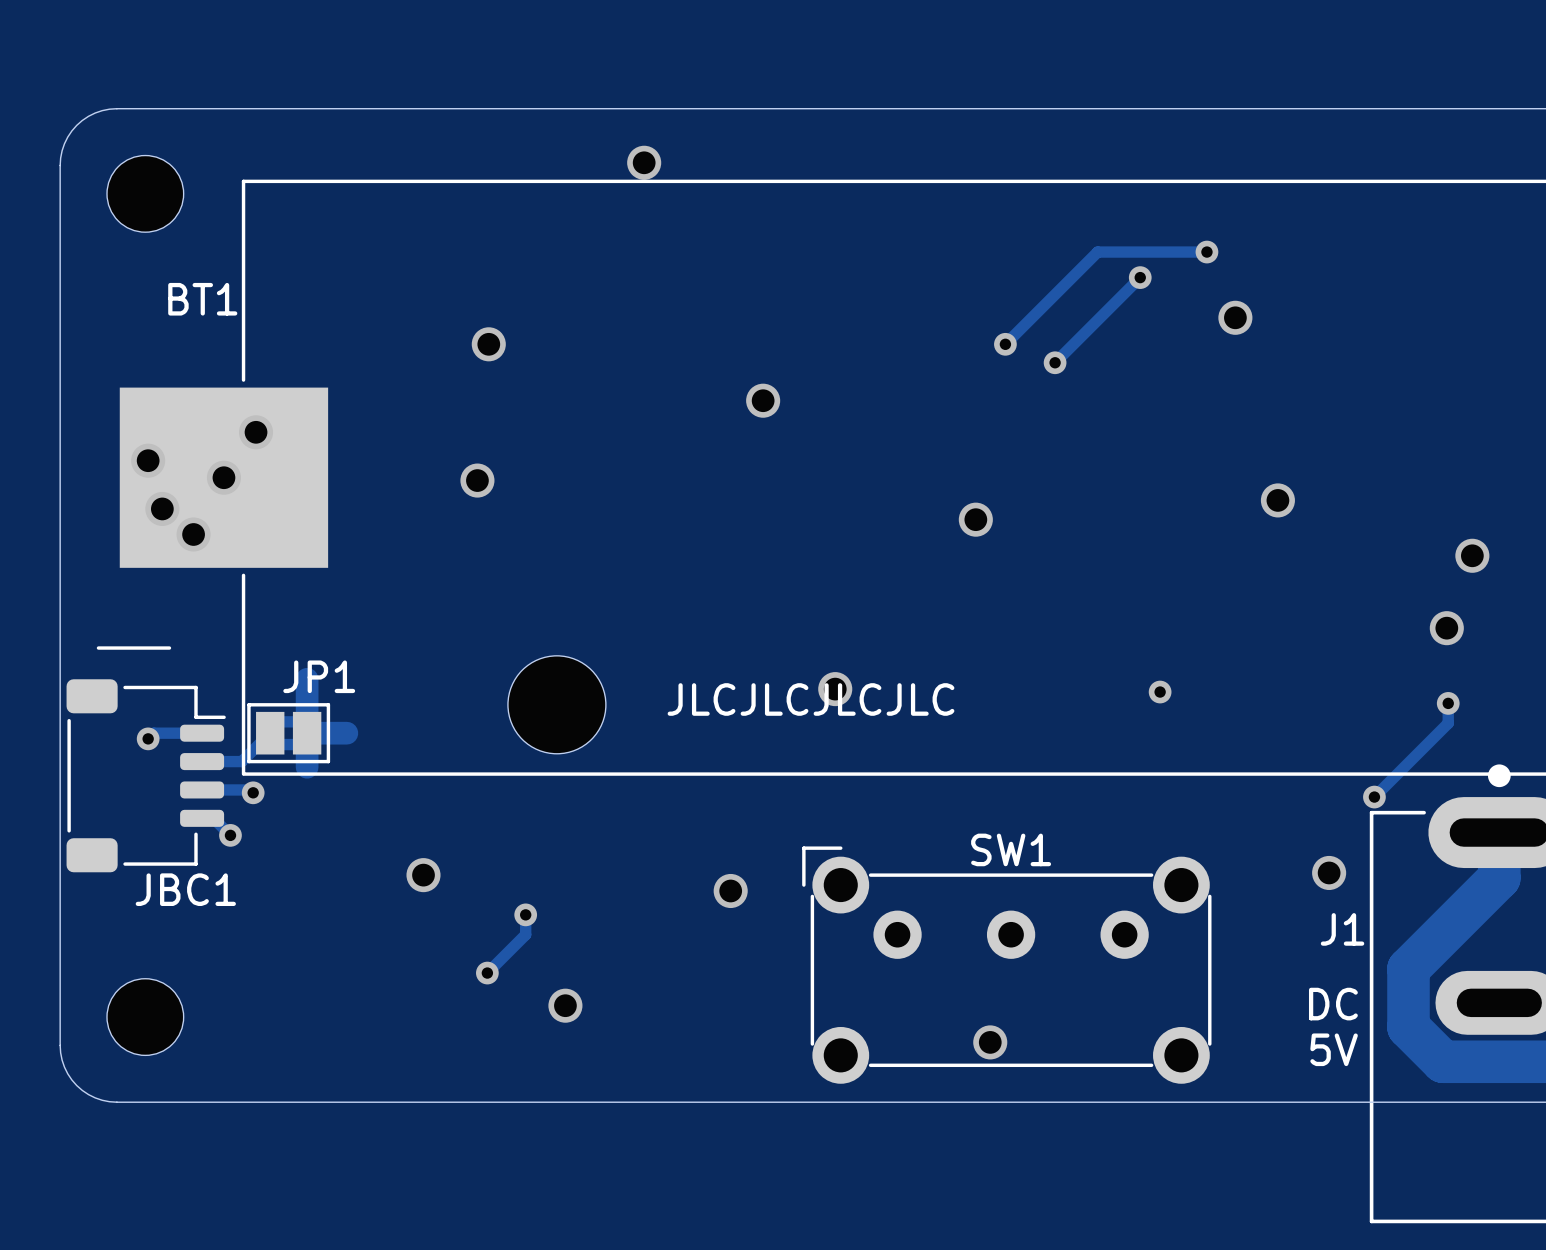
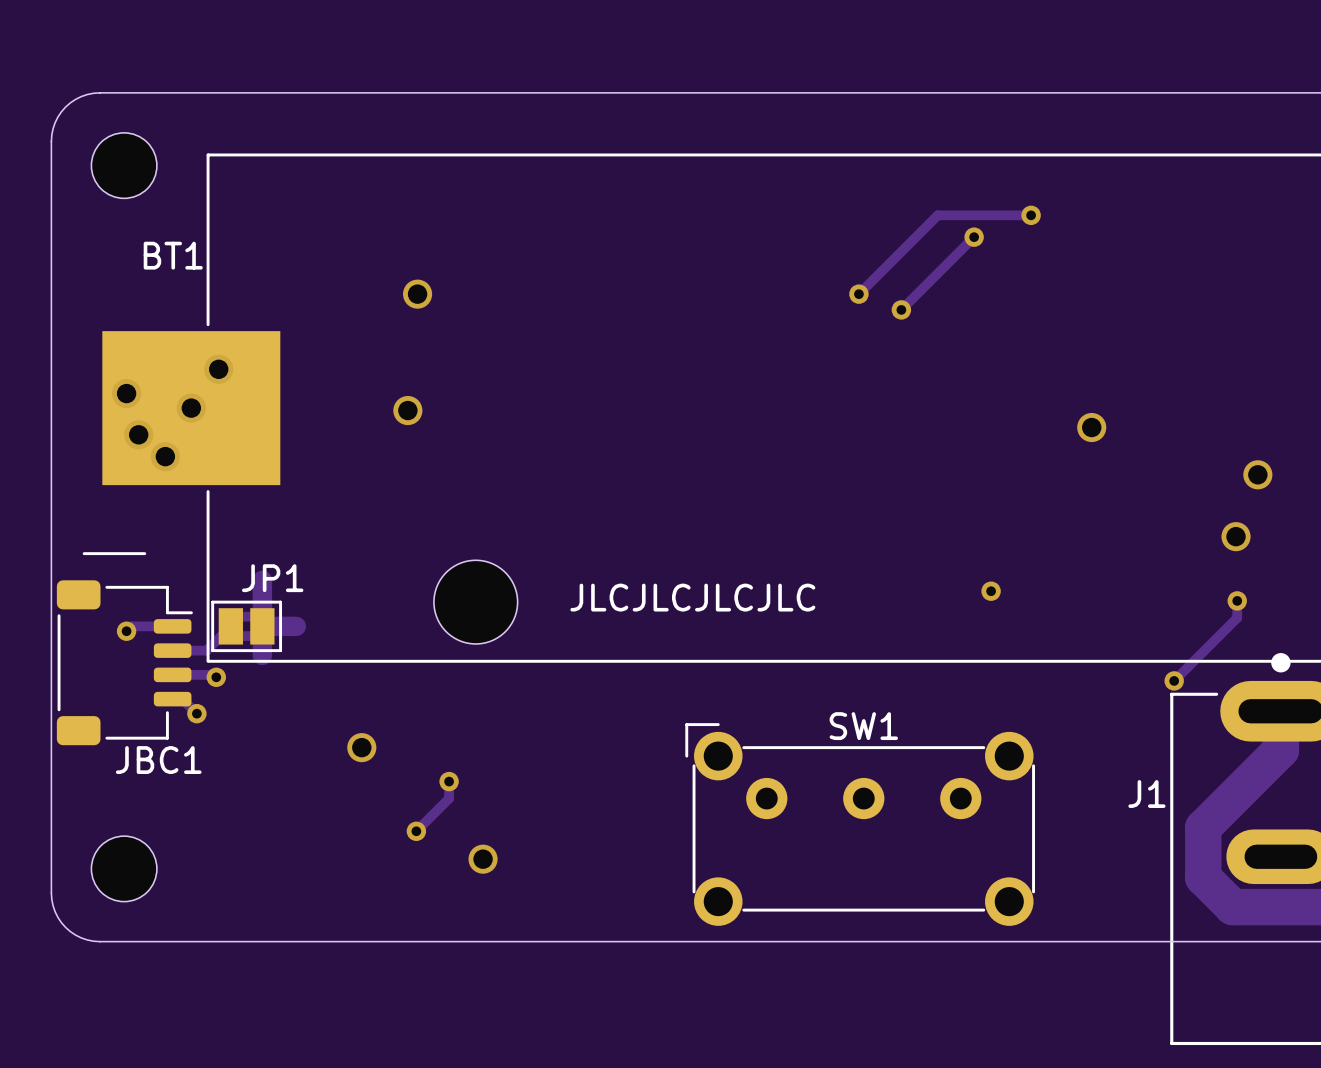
via: (644, 162) -> none
via: (1235, 317) -> none
via: (763, 400) -> none
via: (975, 519) -> none
via: (835, 689) -> none
via: (1329, 872) -> none
via: (730, 890) -> none
text: DC (1333, 1004) -> none
via: (990, 1042) -> none
text: 5V (1334, 1049) -> none

